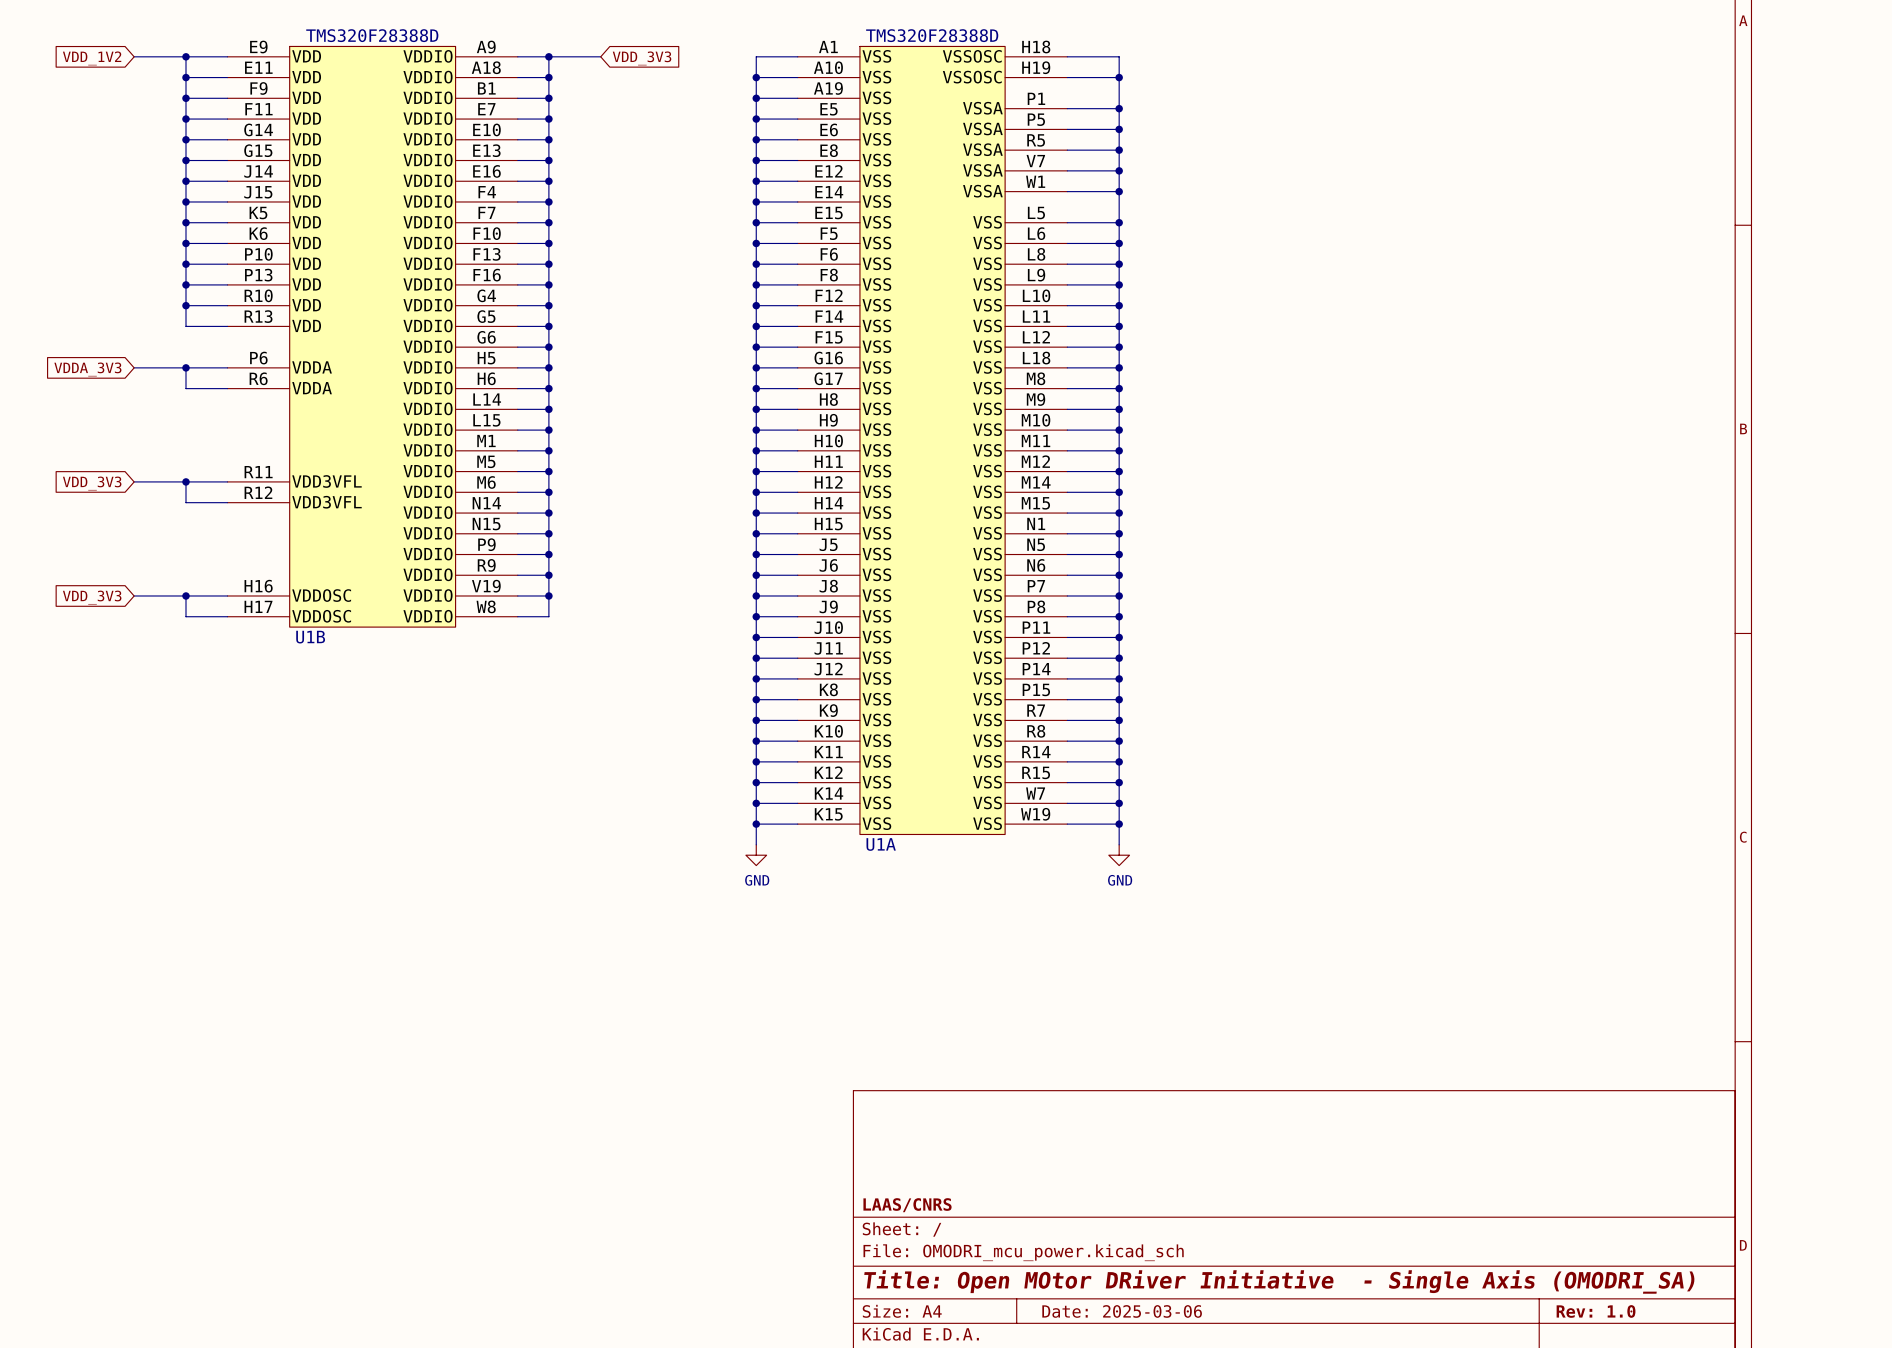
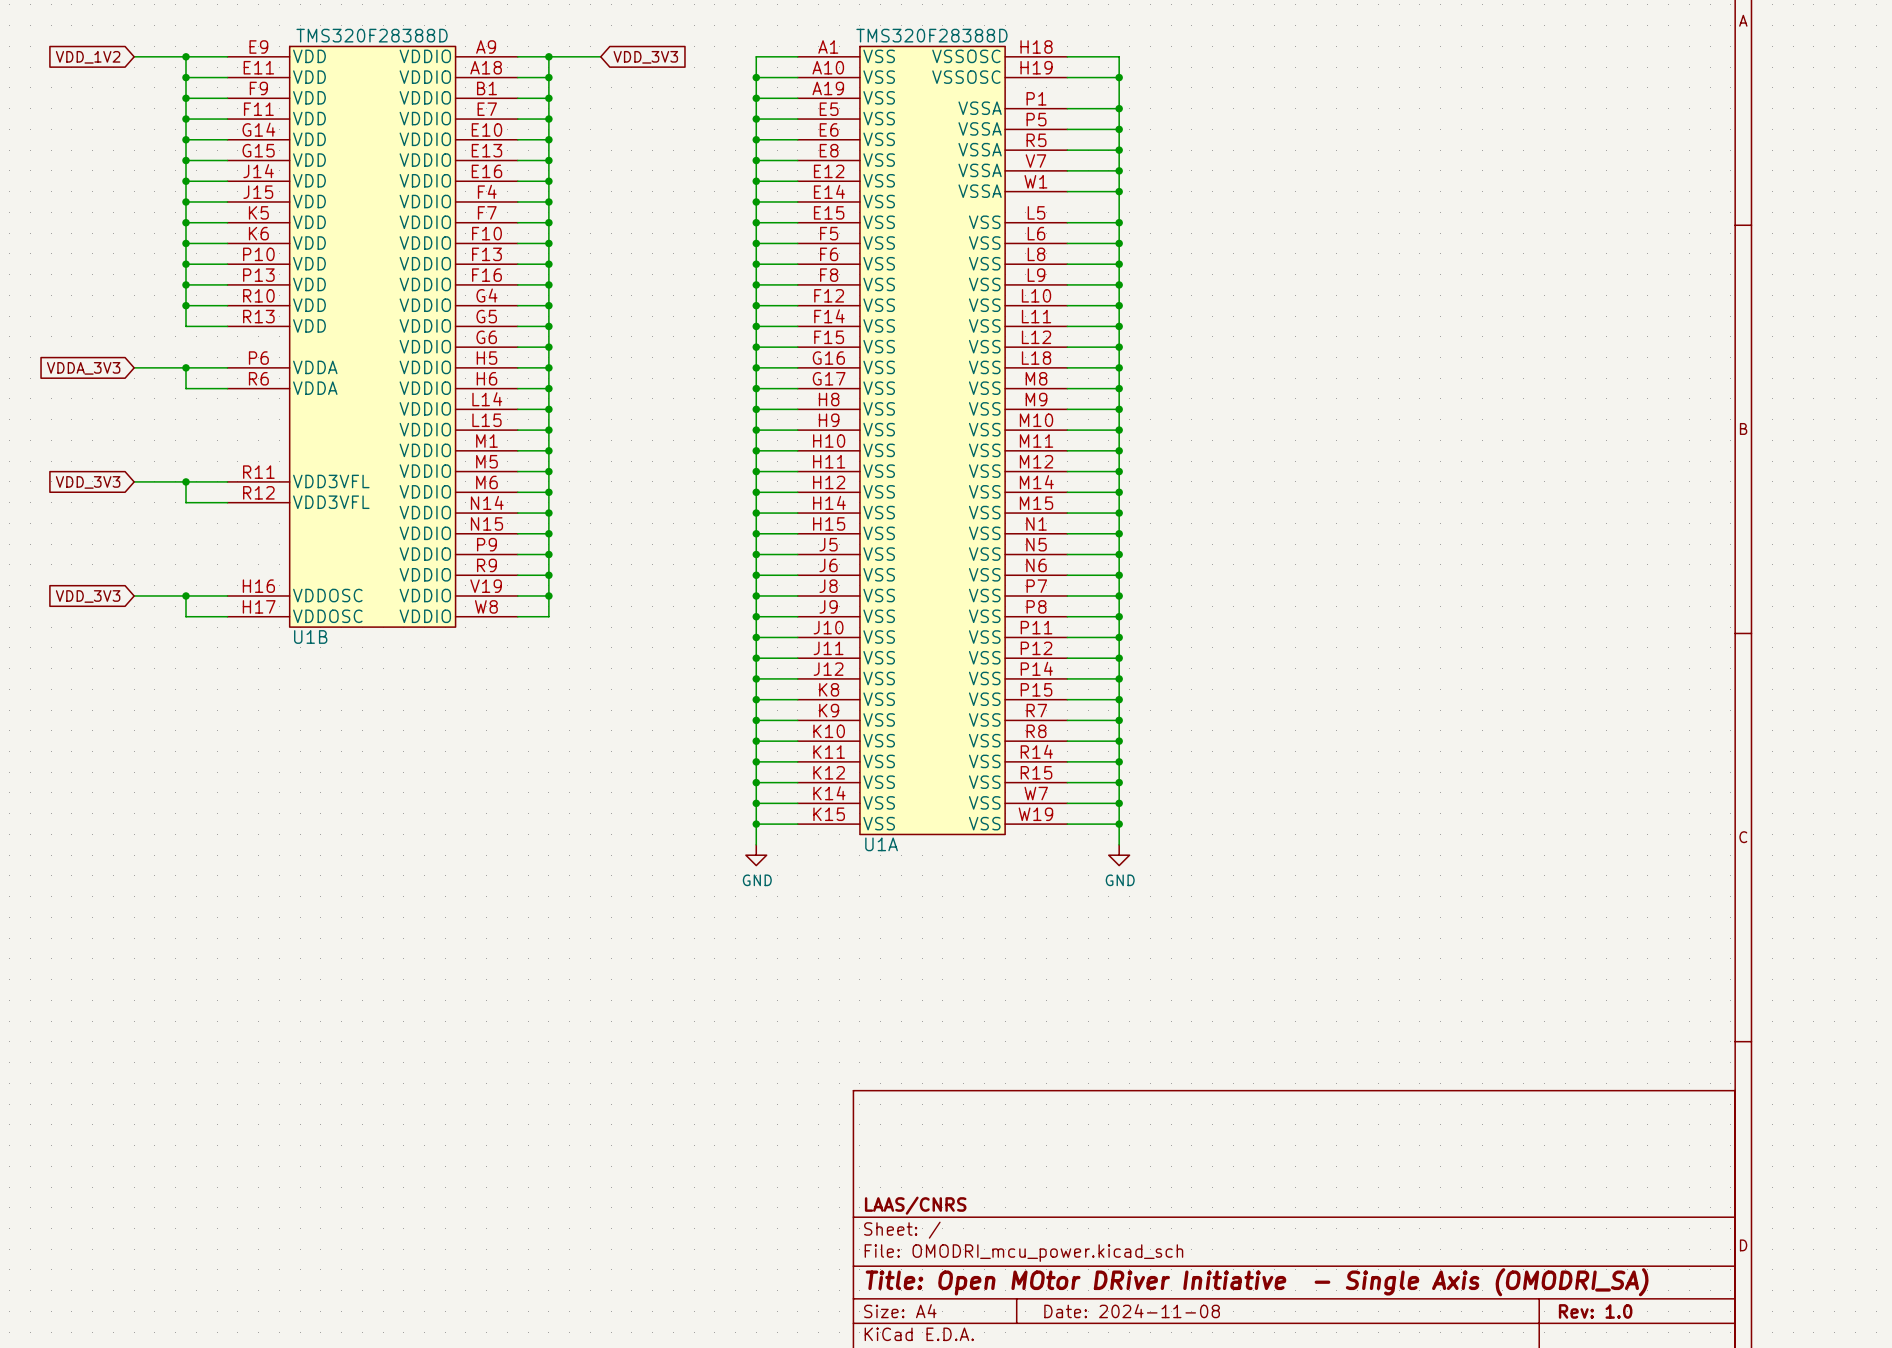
title block: Date: 2025-03-06 (1122, 1311) -> Date: 2024-11-08 (1132, 1311)

